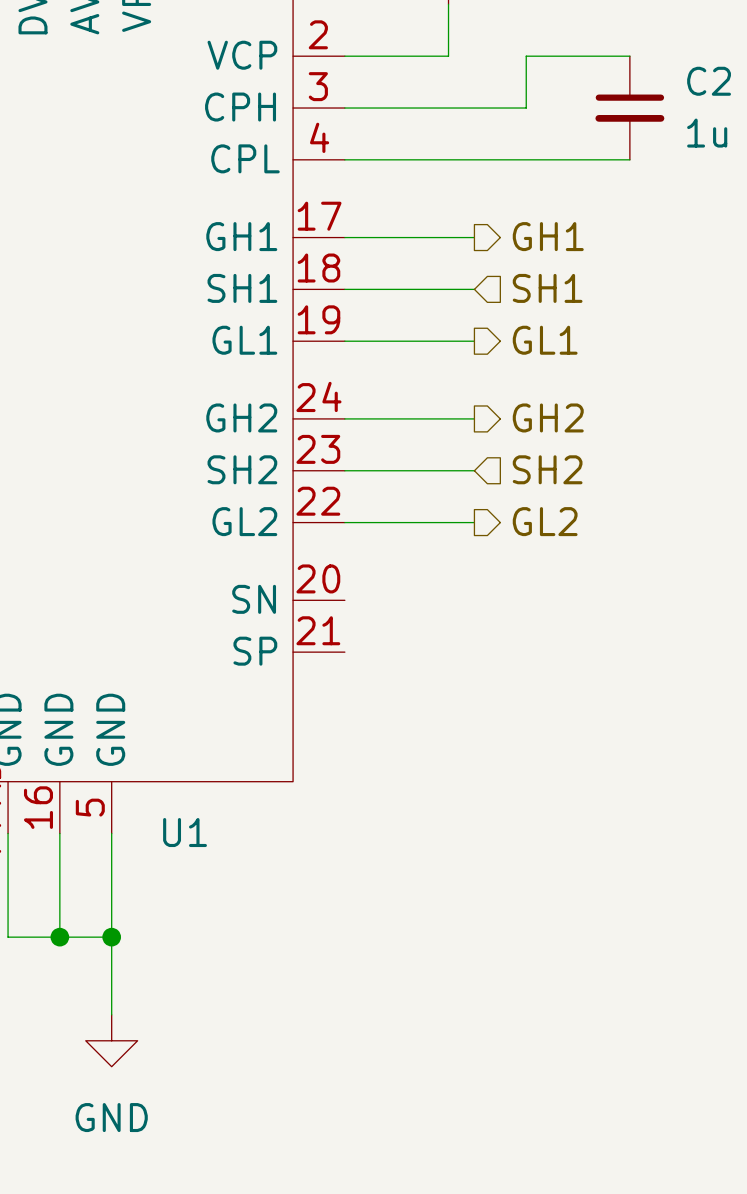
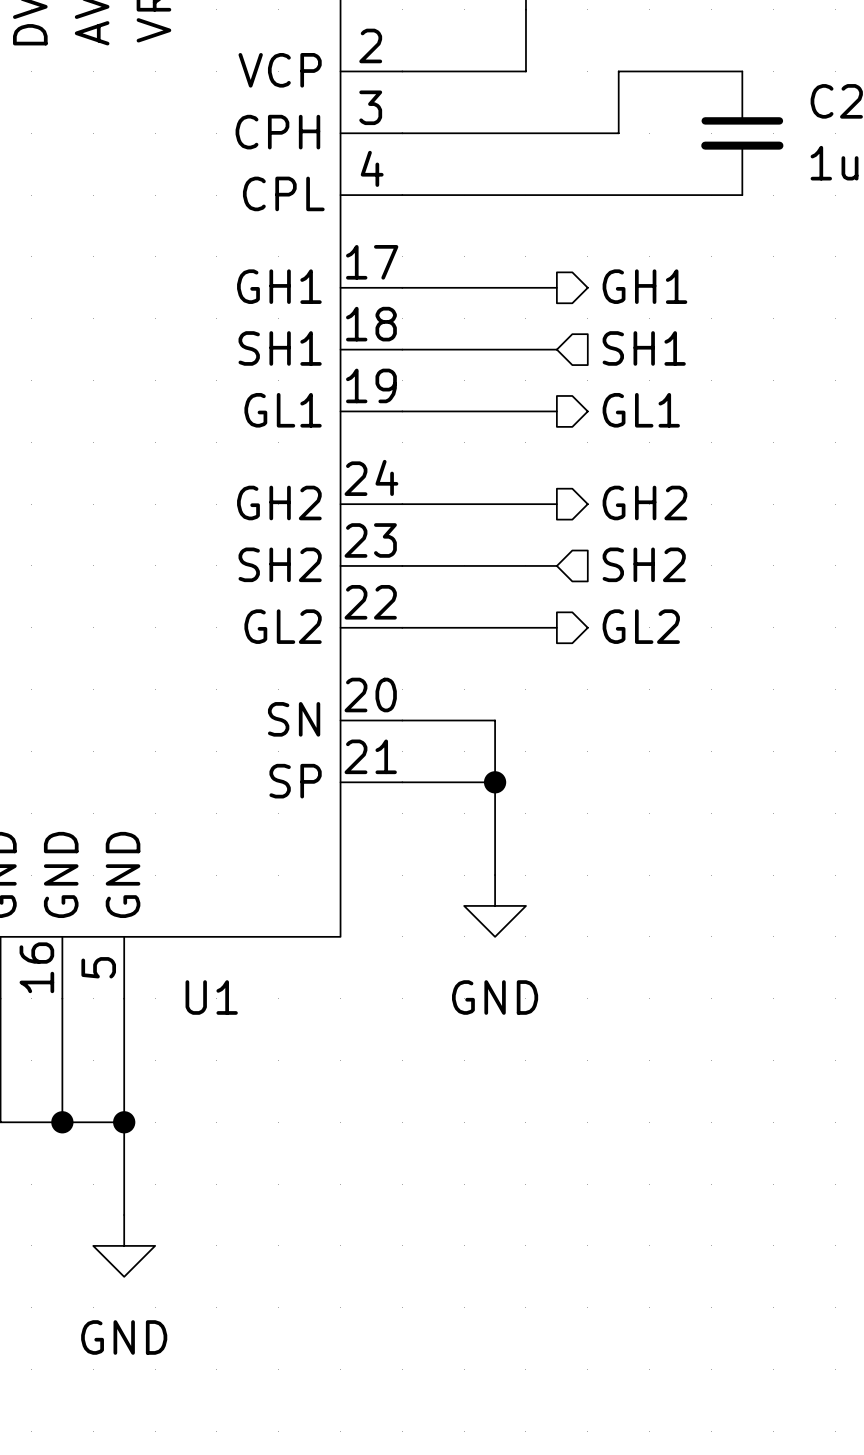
wire: none -> (402, 720) (495, 720) (495, 875)
wire: none -> (402, 782) (495, 782)
junction: none -> (495, 782)
power symbol: none -> GND (495, 905)

